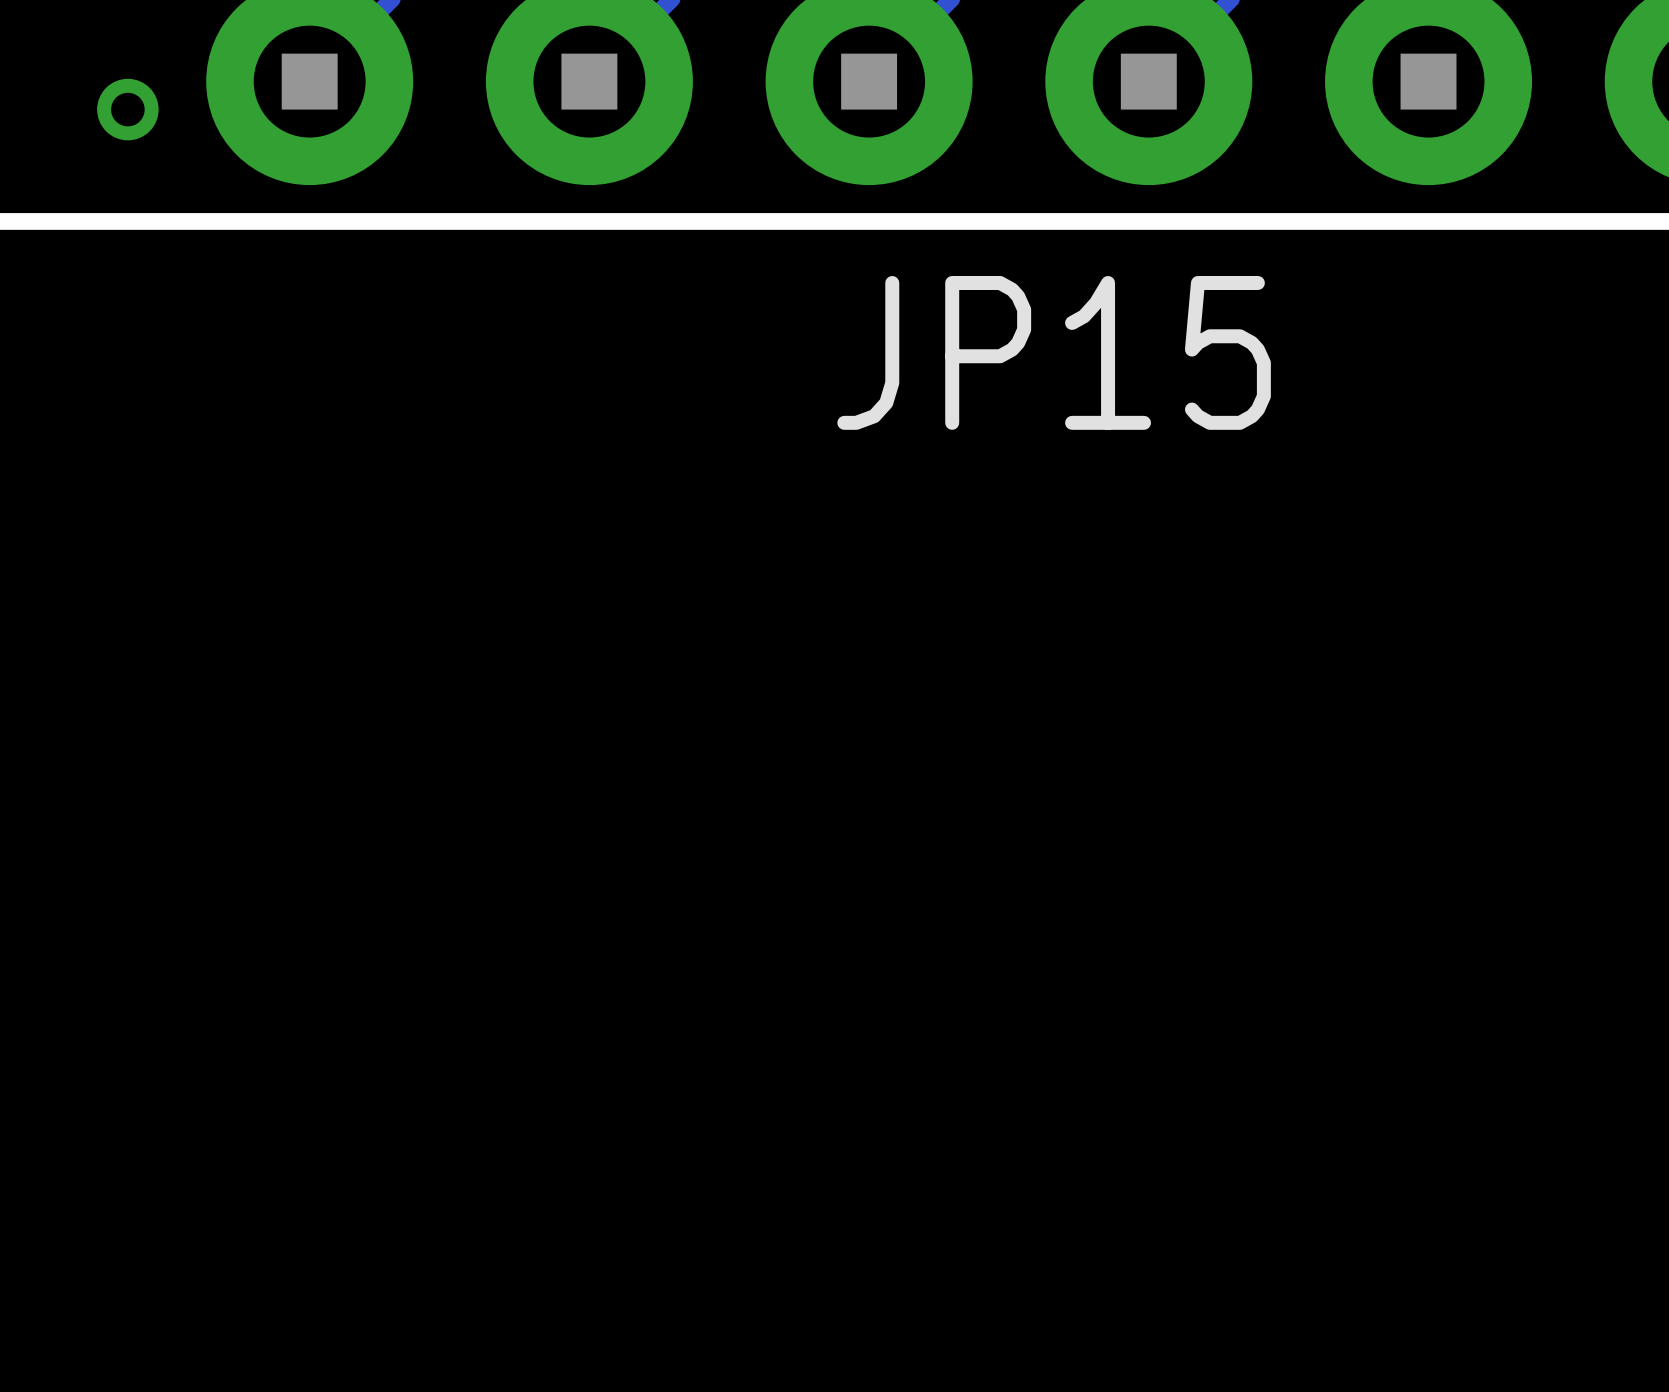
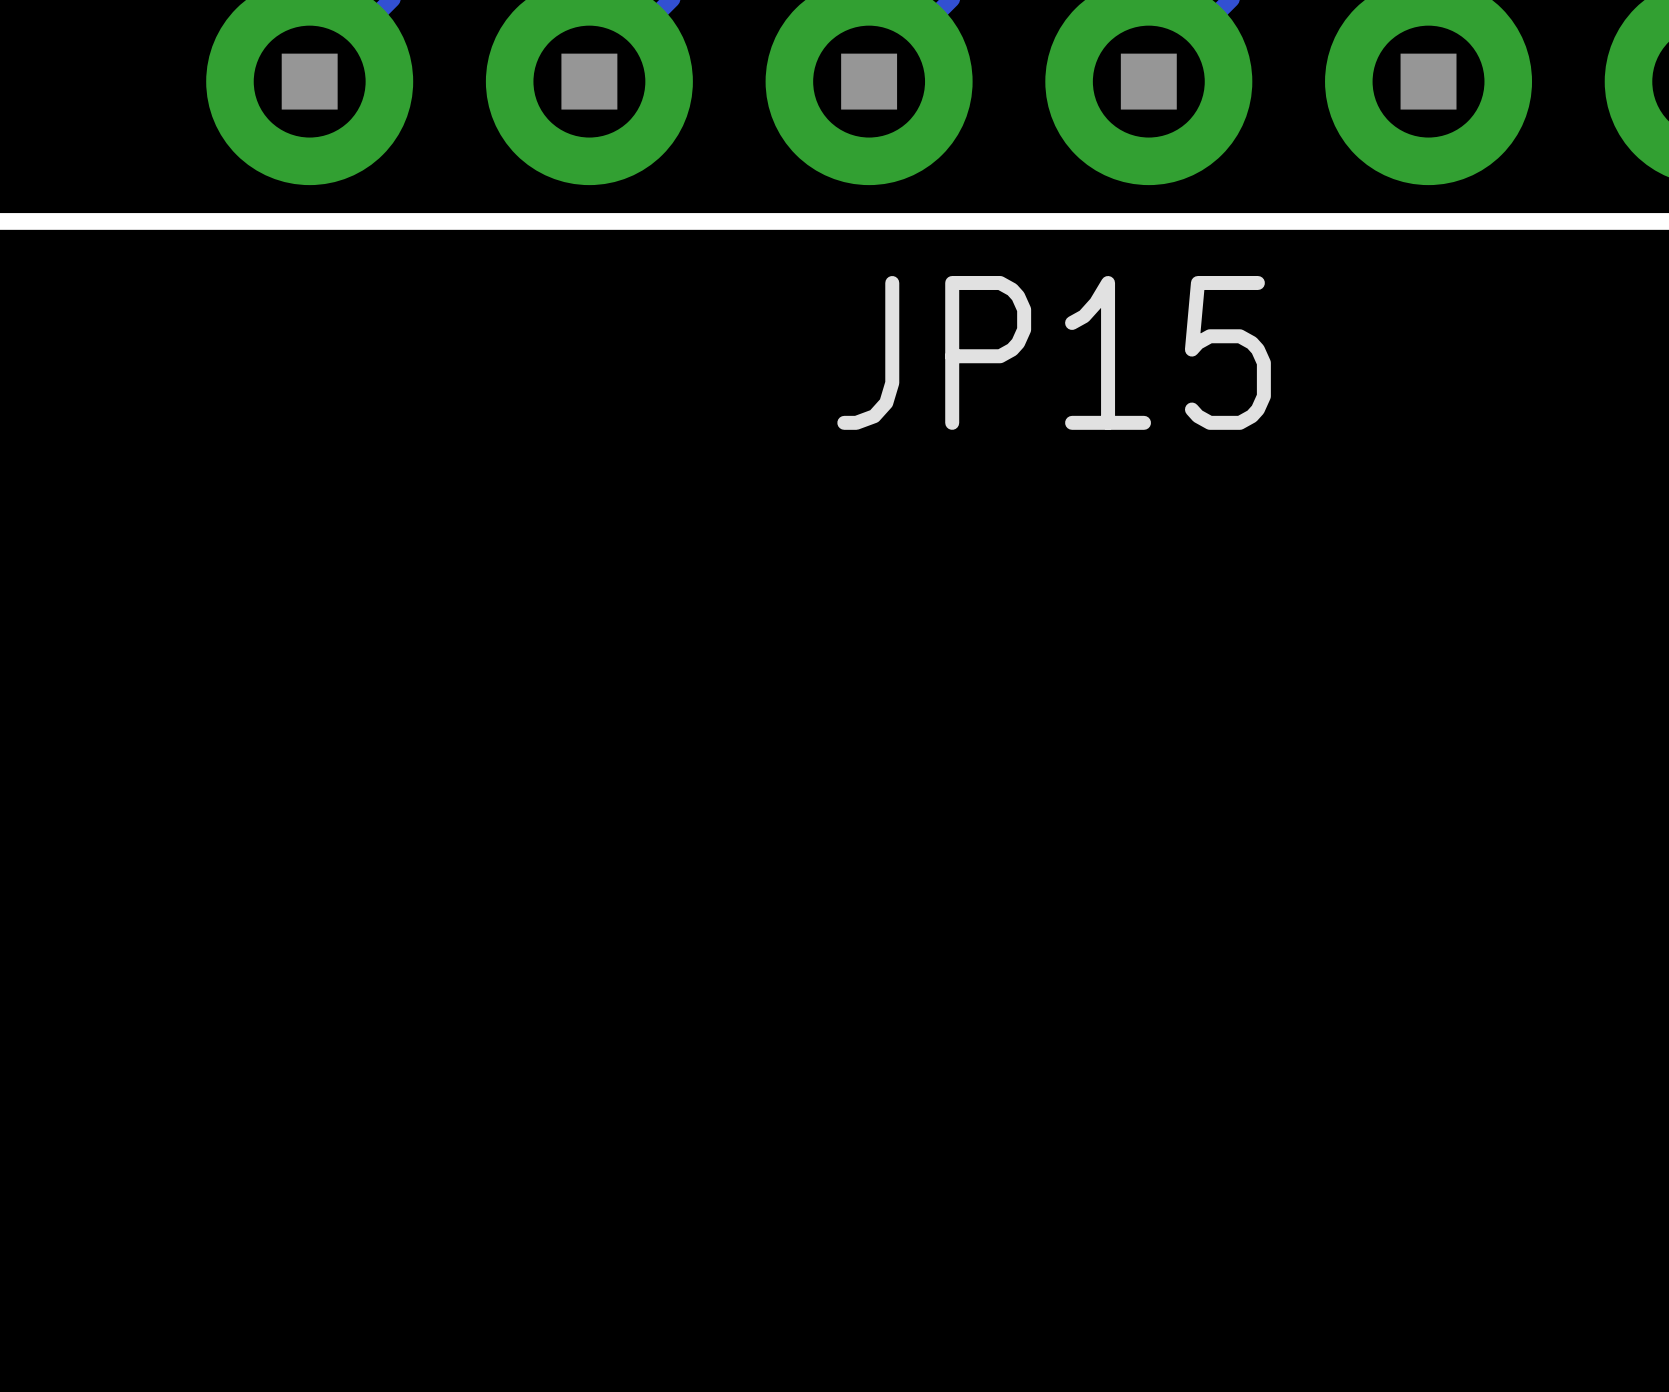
via: (127, 109) -> none

